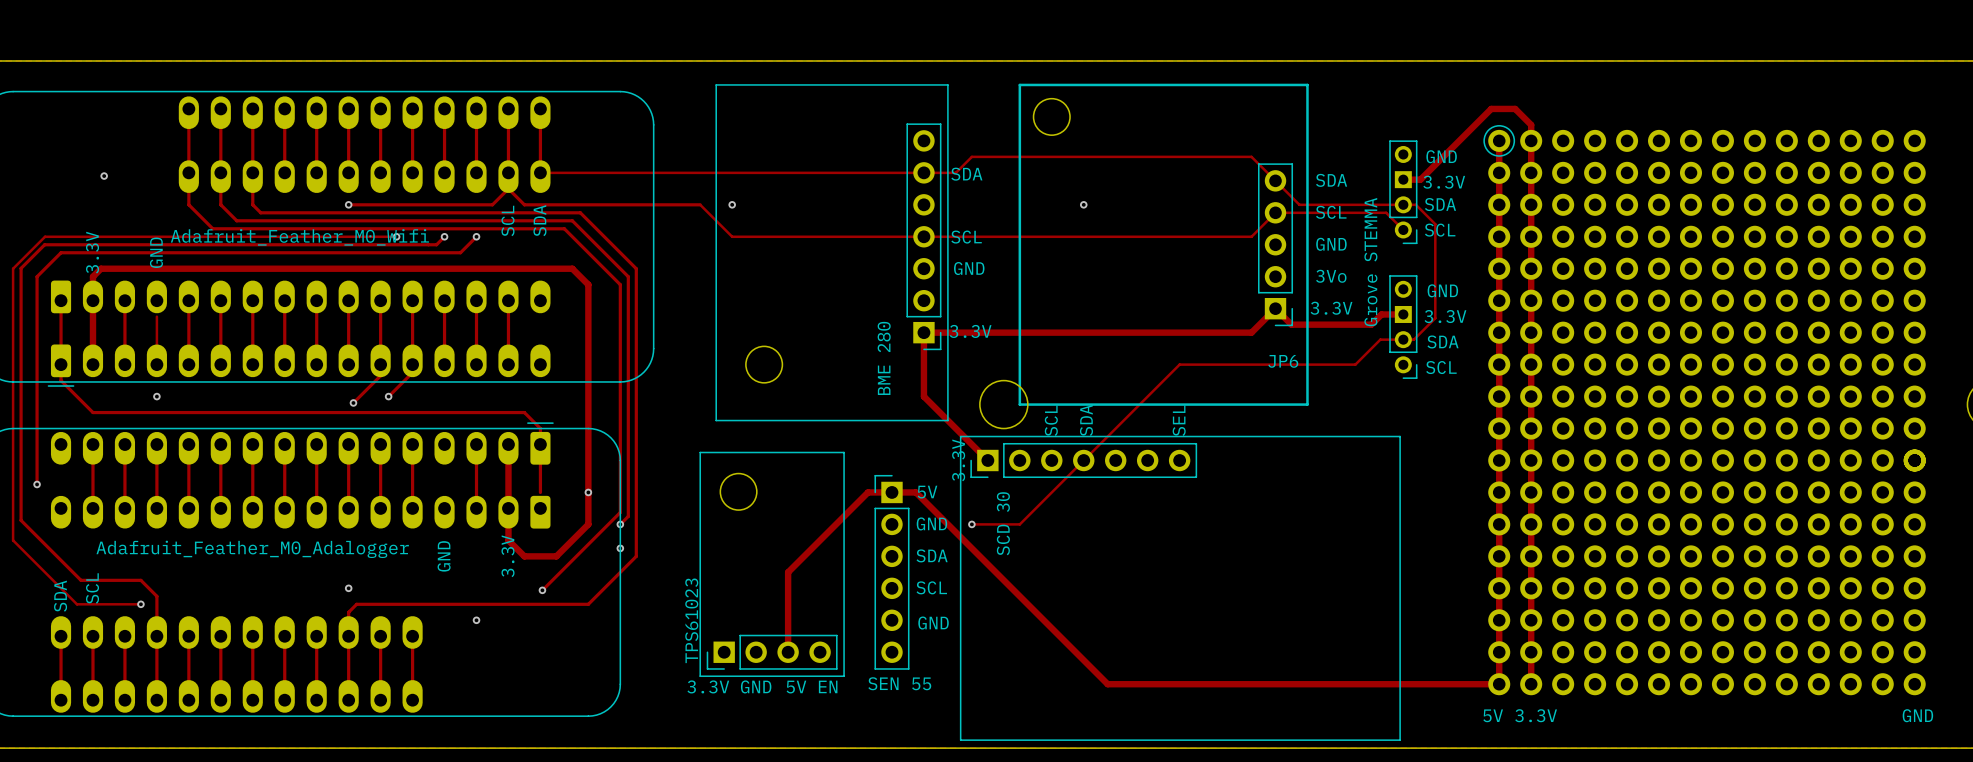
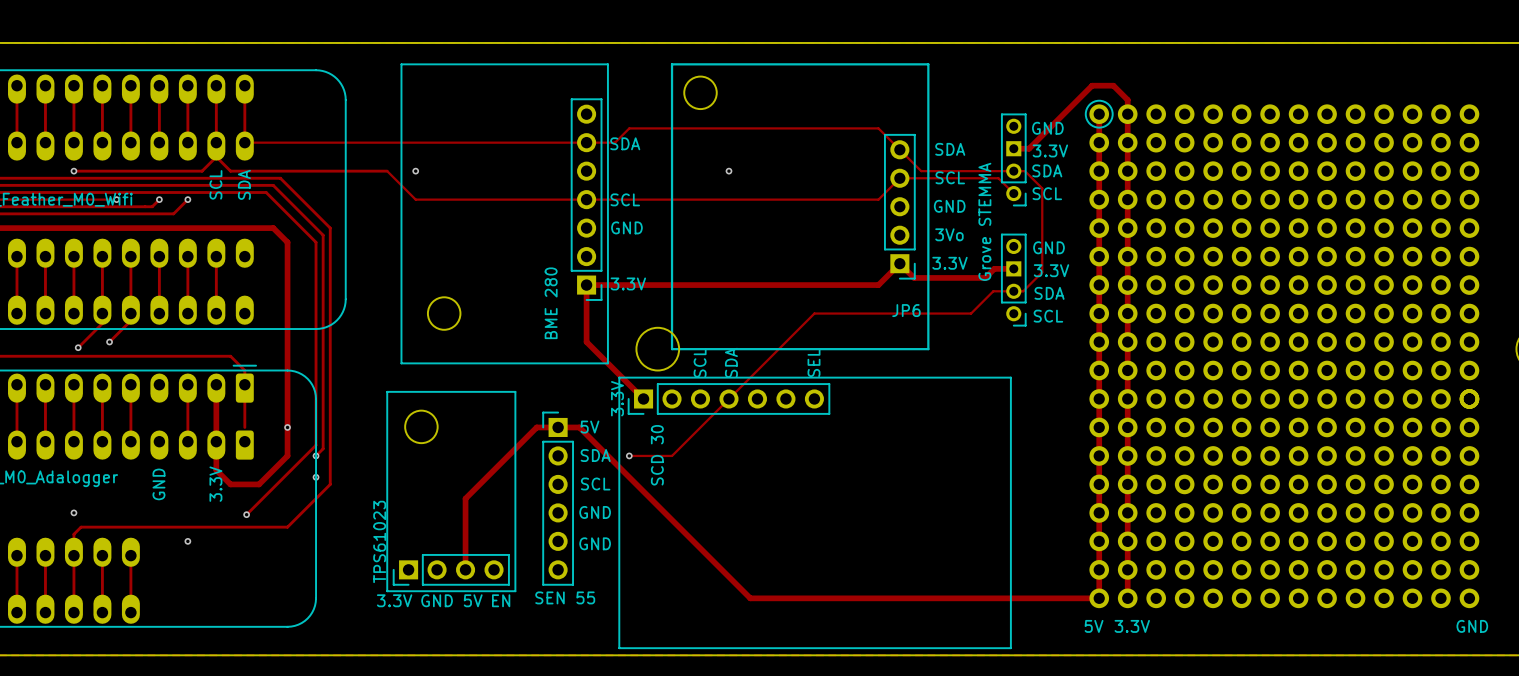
text: GND (931, 523) -> SDA (595, 455)
text: SDA (932, 555) -> SCL (595, 484)
text: SCL (931, 587) -> GND (595, 512)

